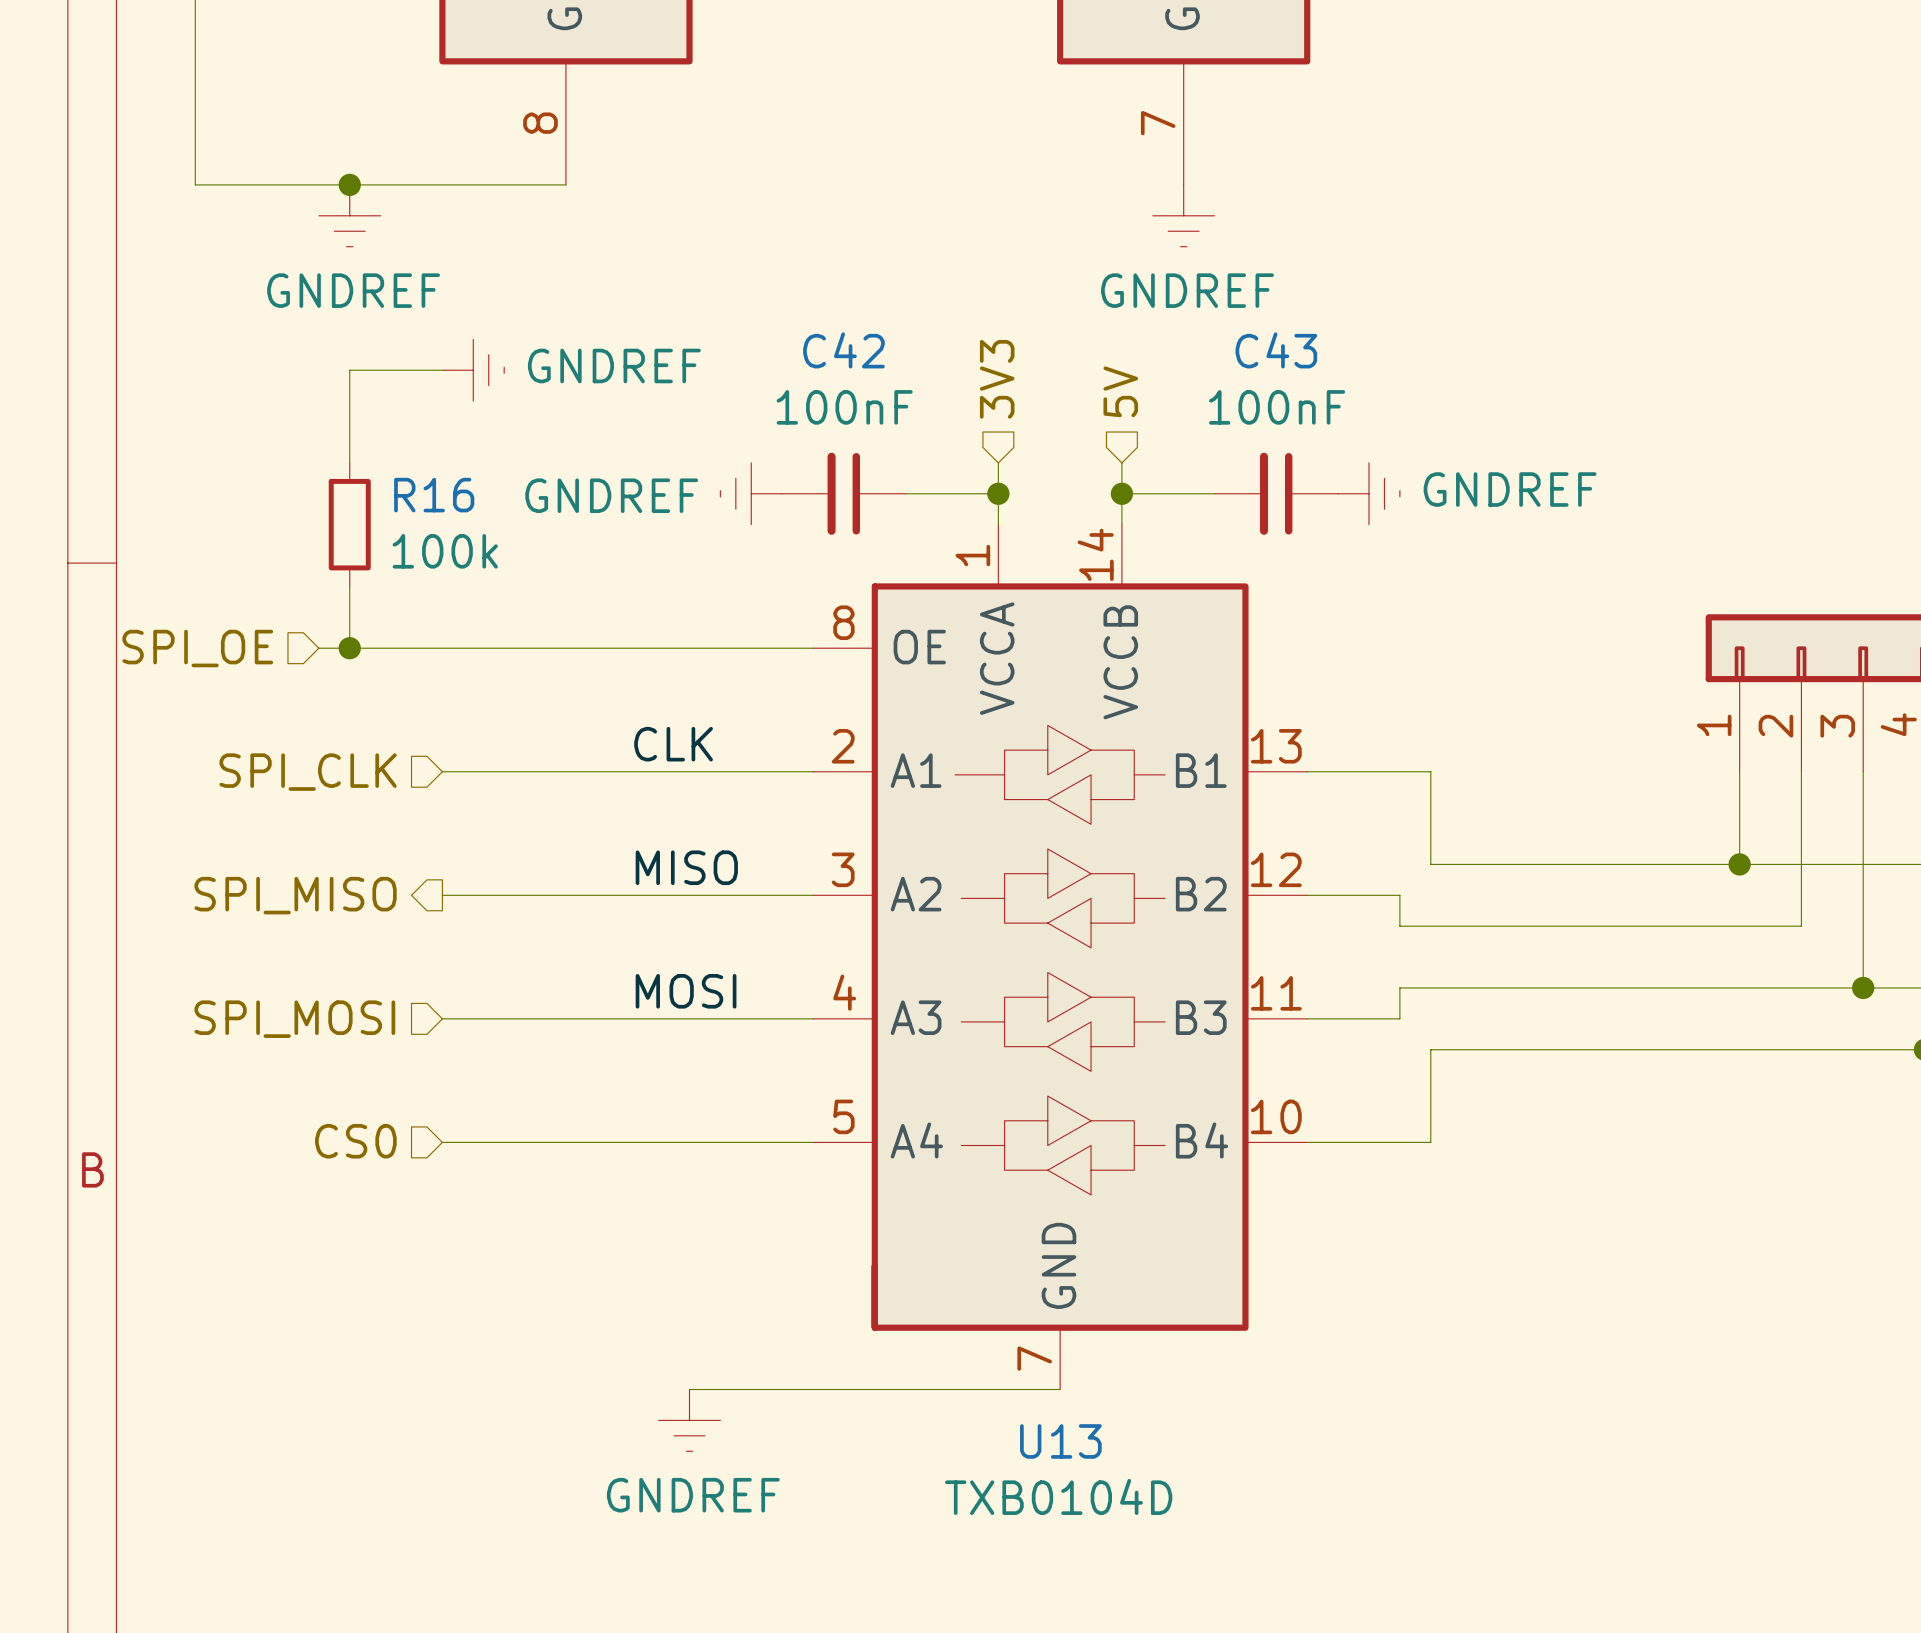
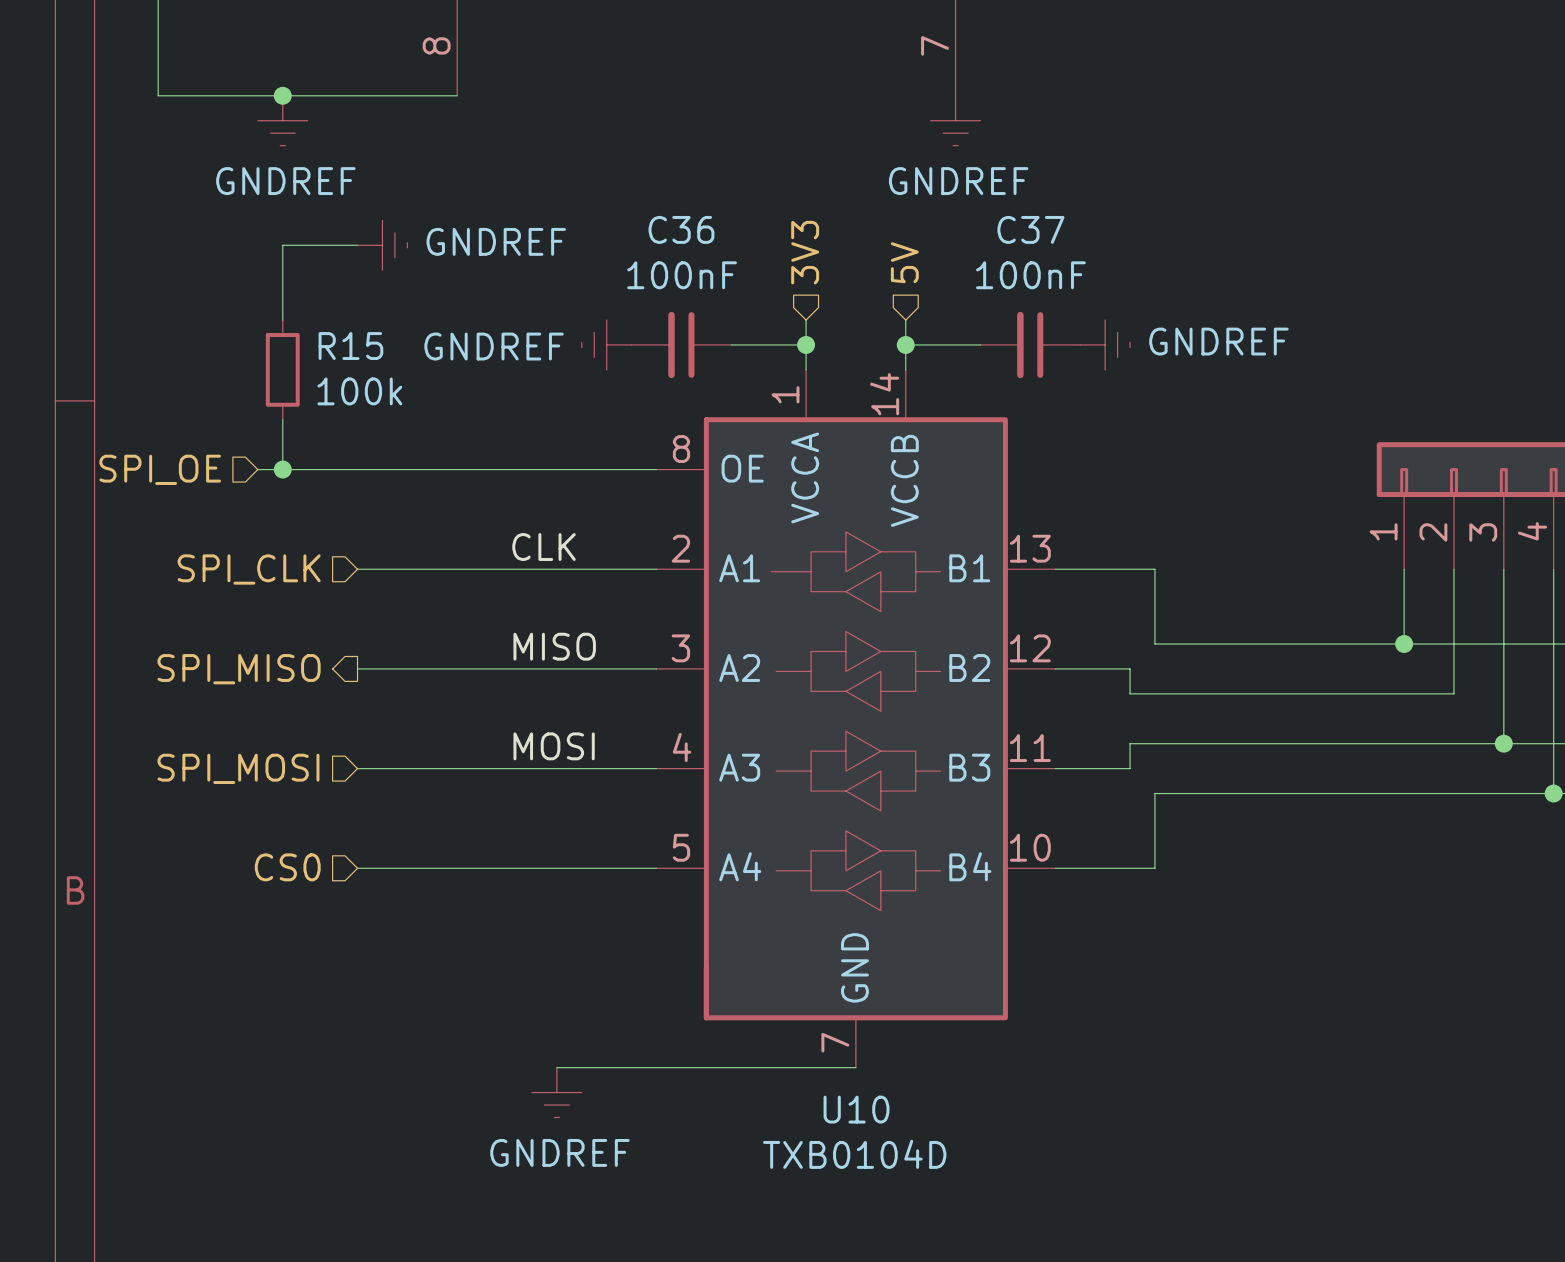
C42 name: C42 (843, 350) -> C36 (681, 229)
C43 name: C43 (1276, 350) -> C37 (1030, 229)
R16 name: R16 (434, 495) -> R15 (350, 346)
U13 name: U13 (1060, 1441) -> U10 (856, 1109)

